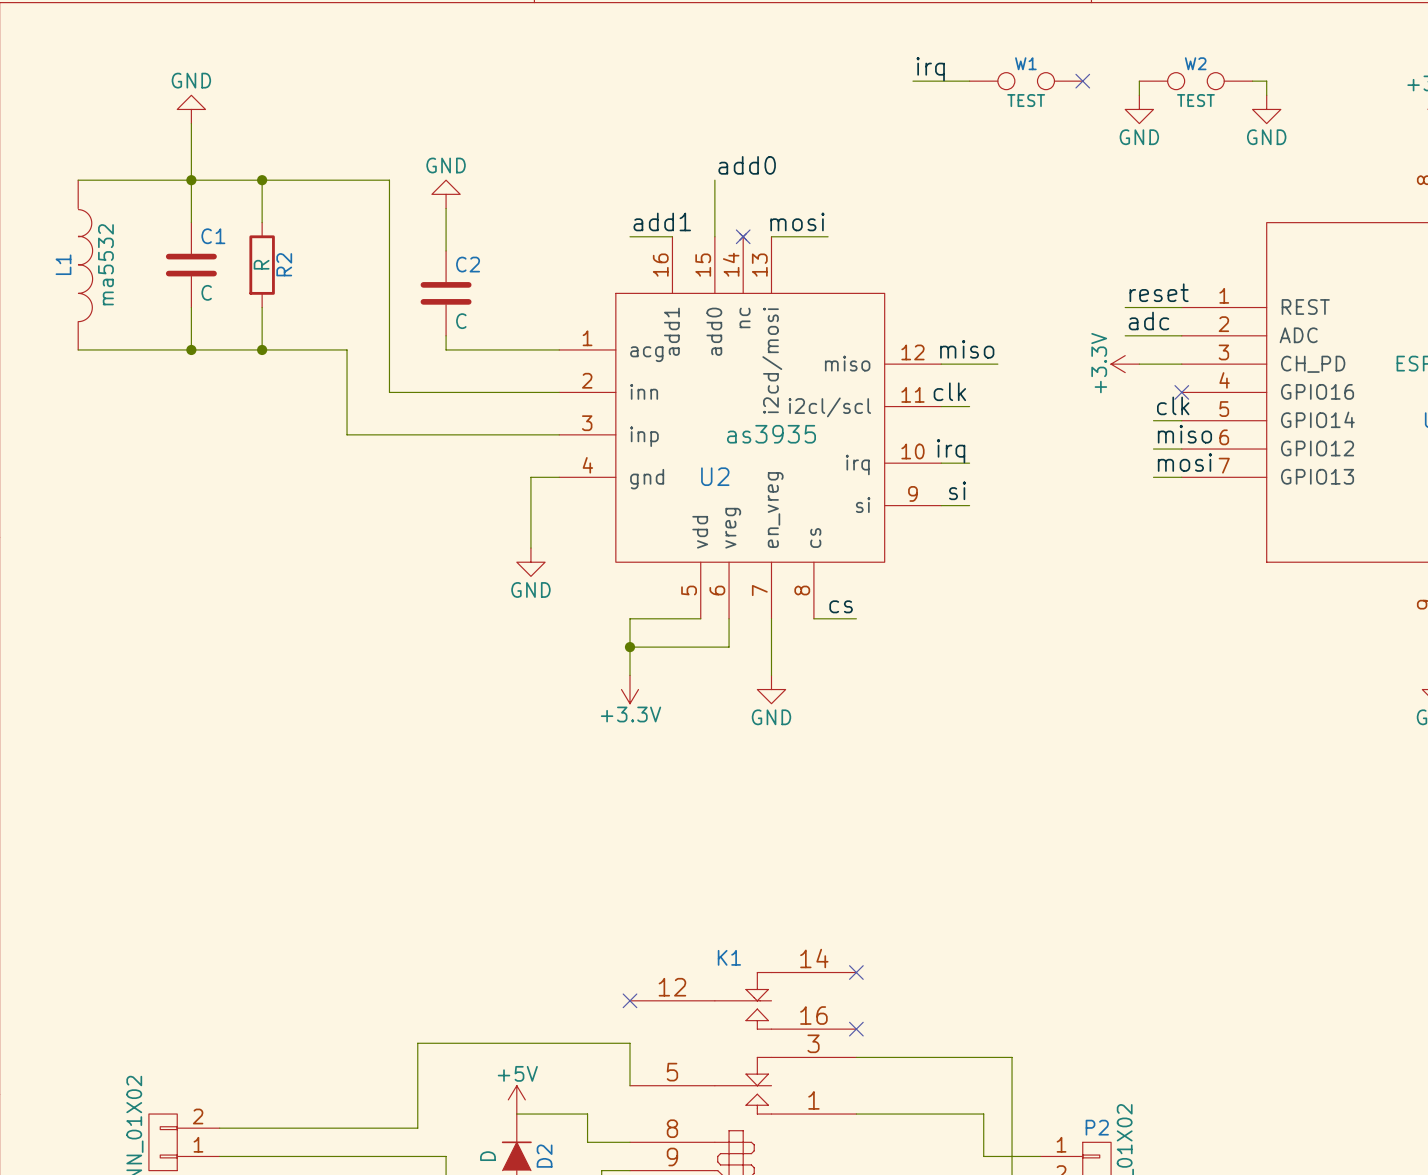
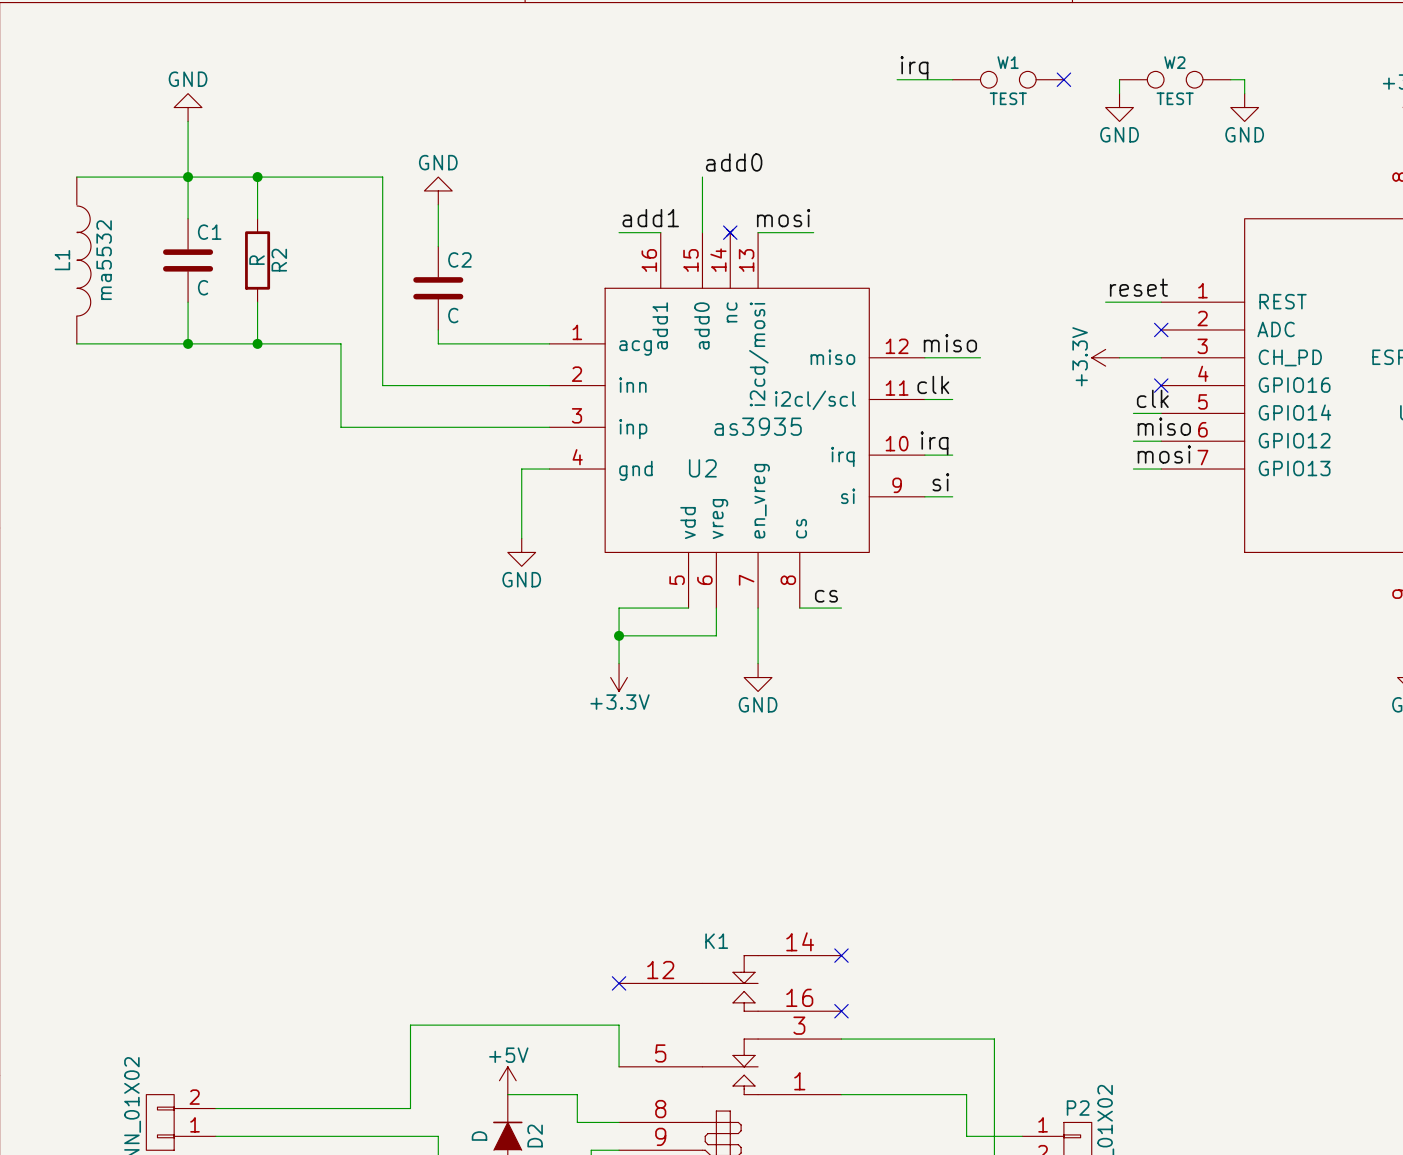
label: adc (1148, 321) -> none
wire: (1125, 335) (1181, 335) -> none
no-connect mark: none -> (1161, 329)

